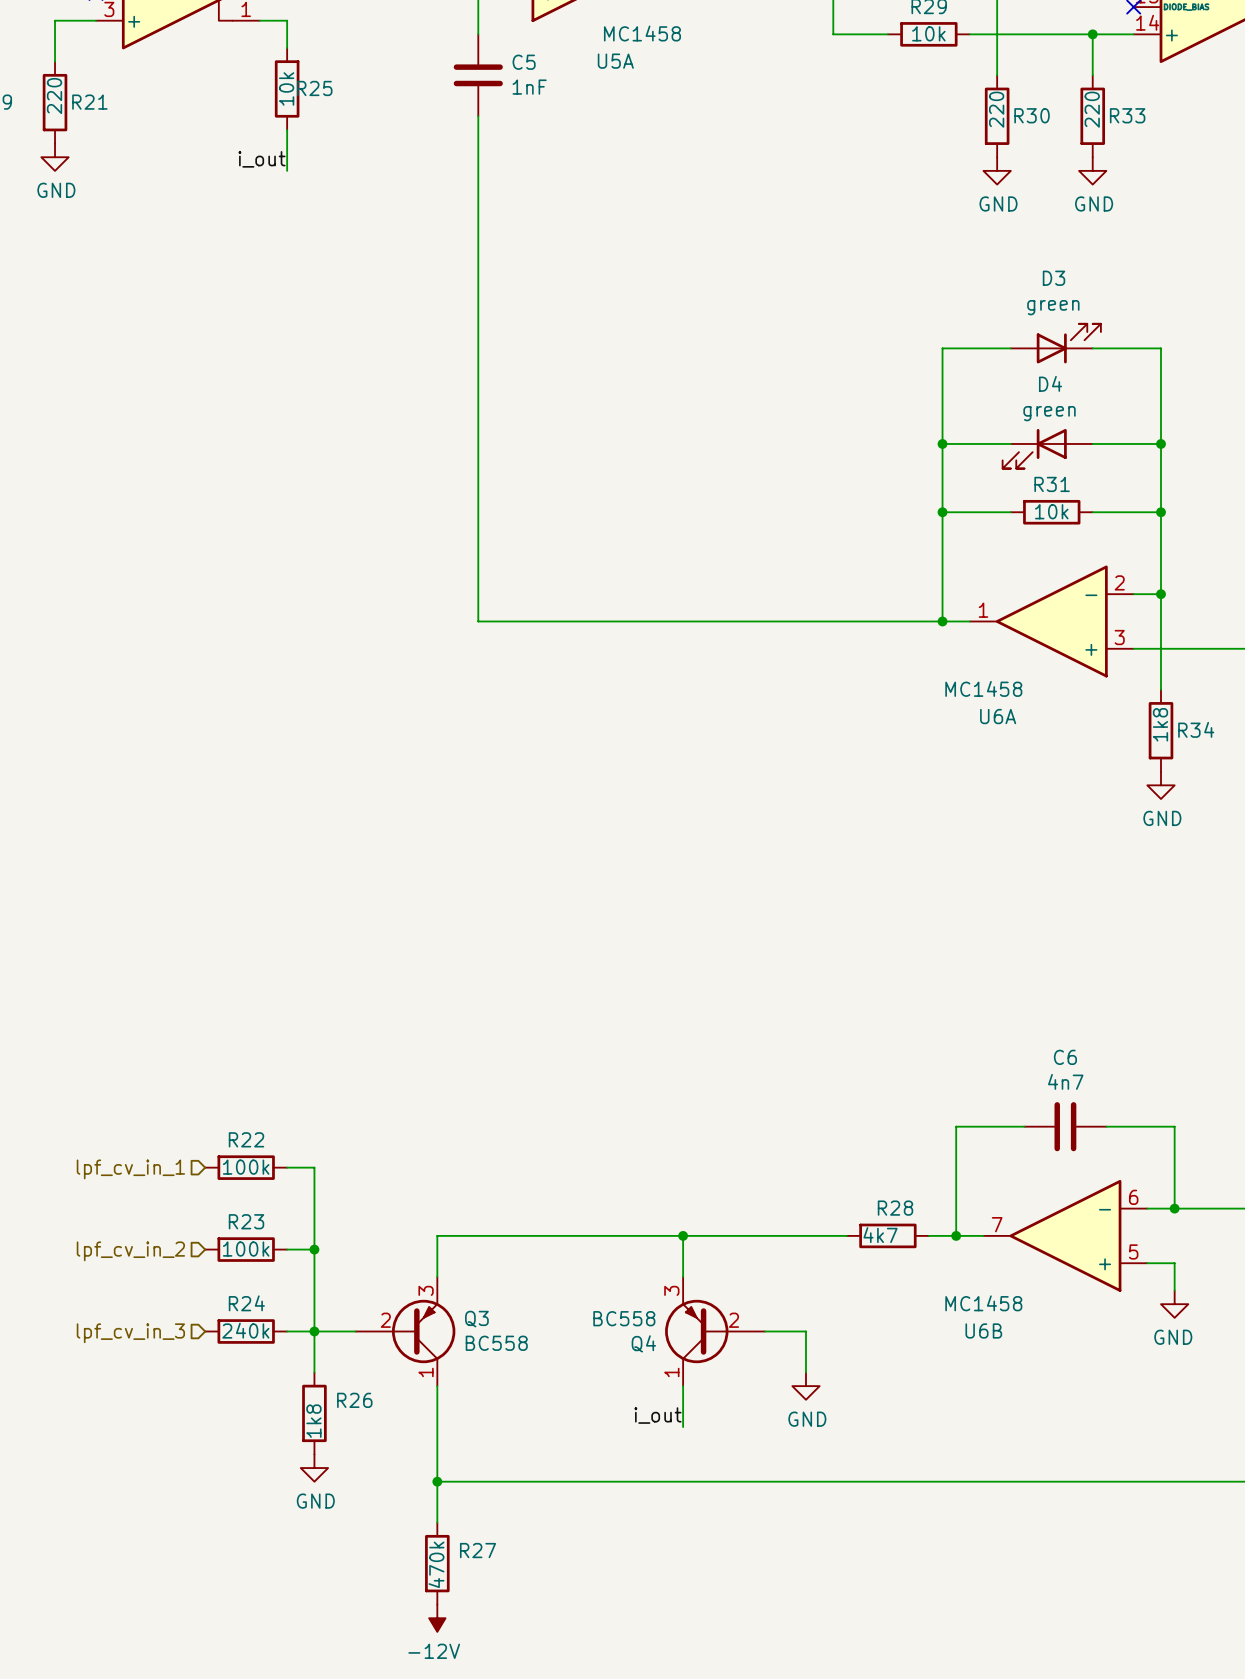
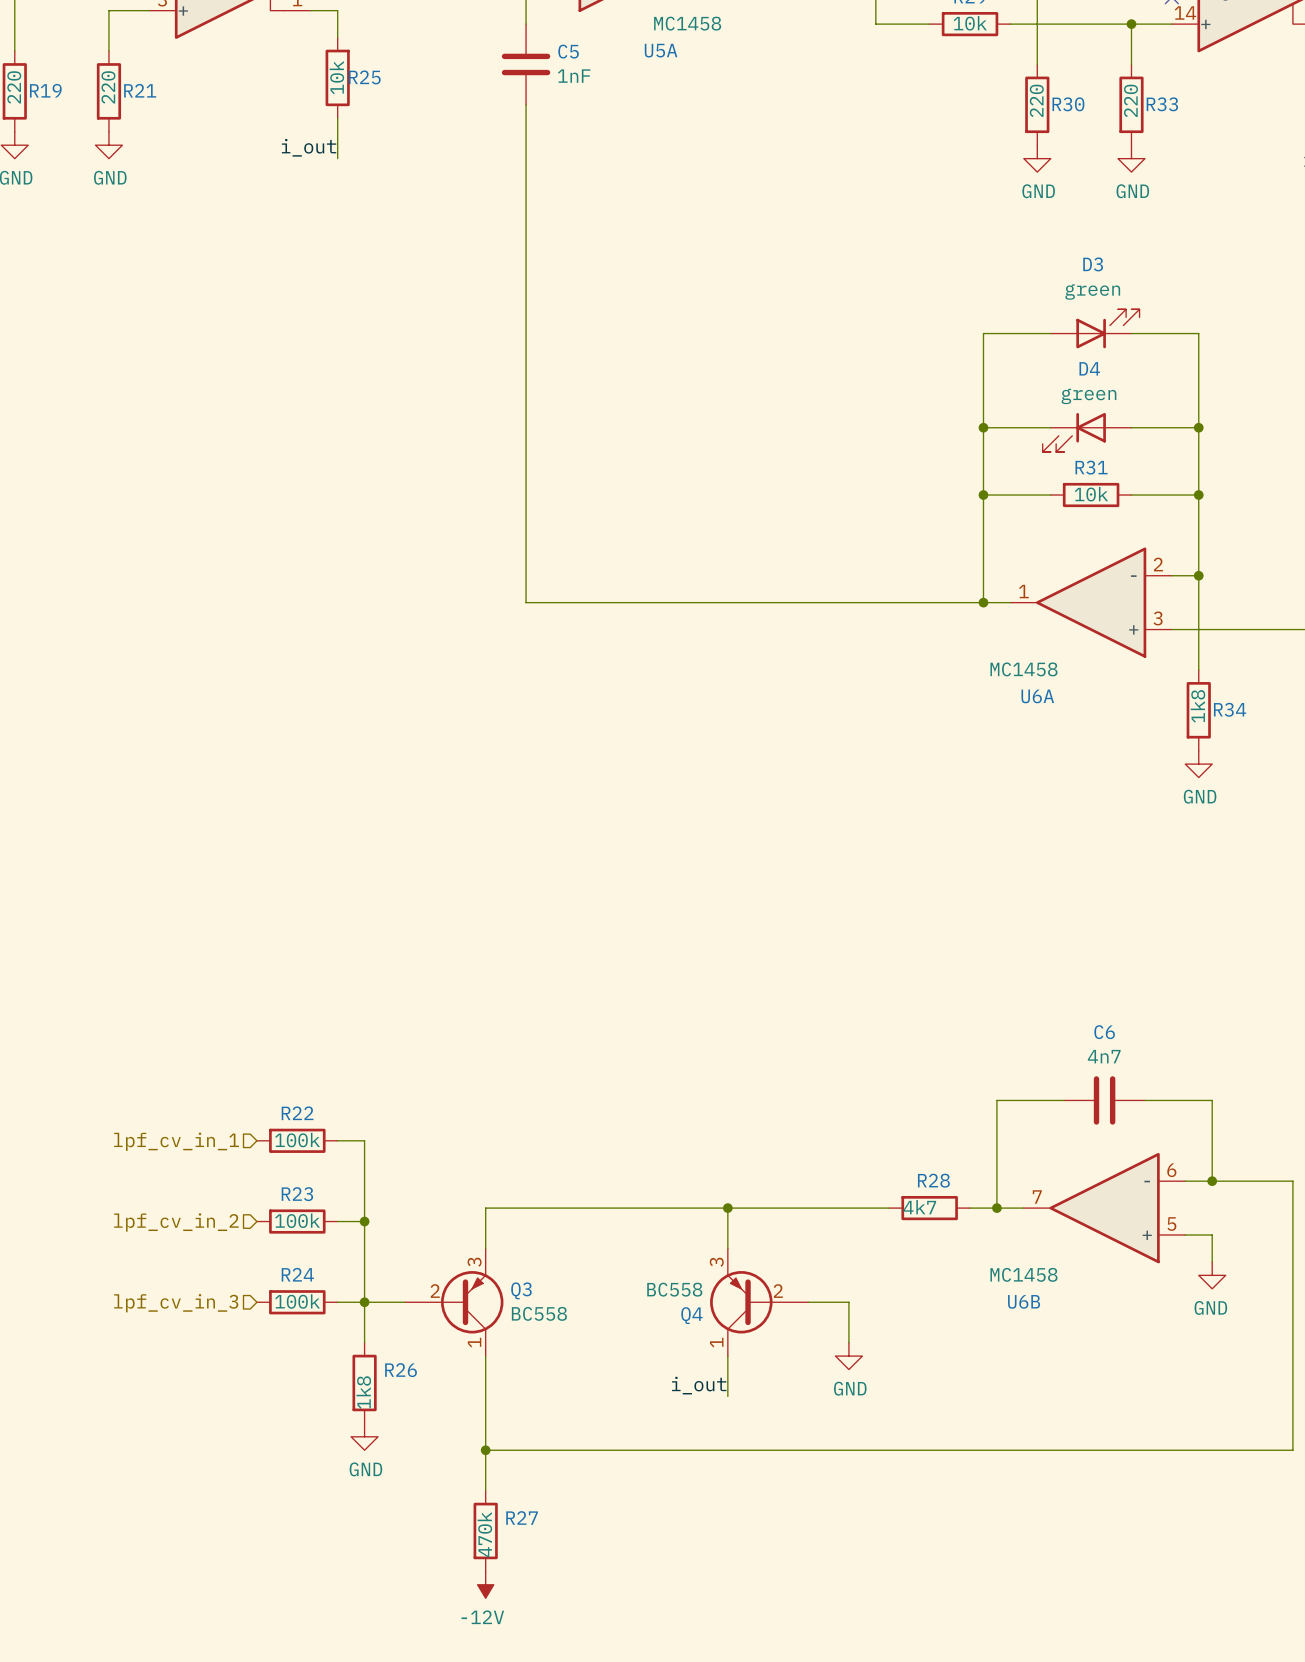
R24 value: 240k (245, 1330) -> 100k (297, 1301)

